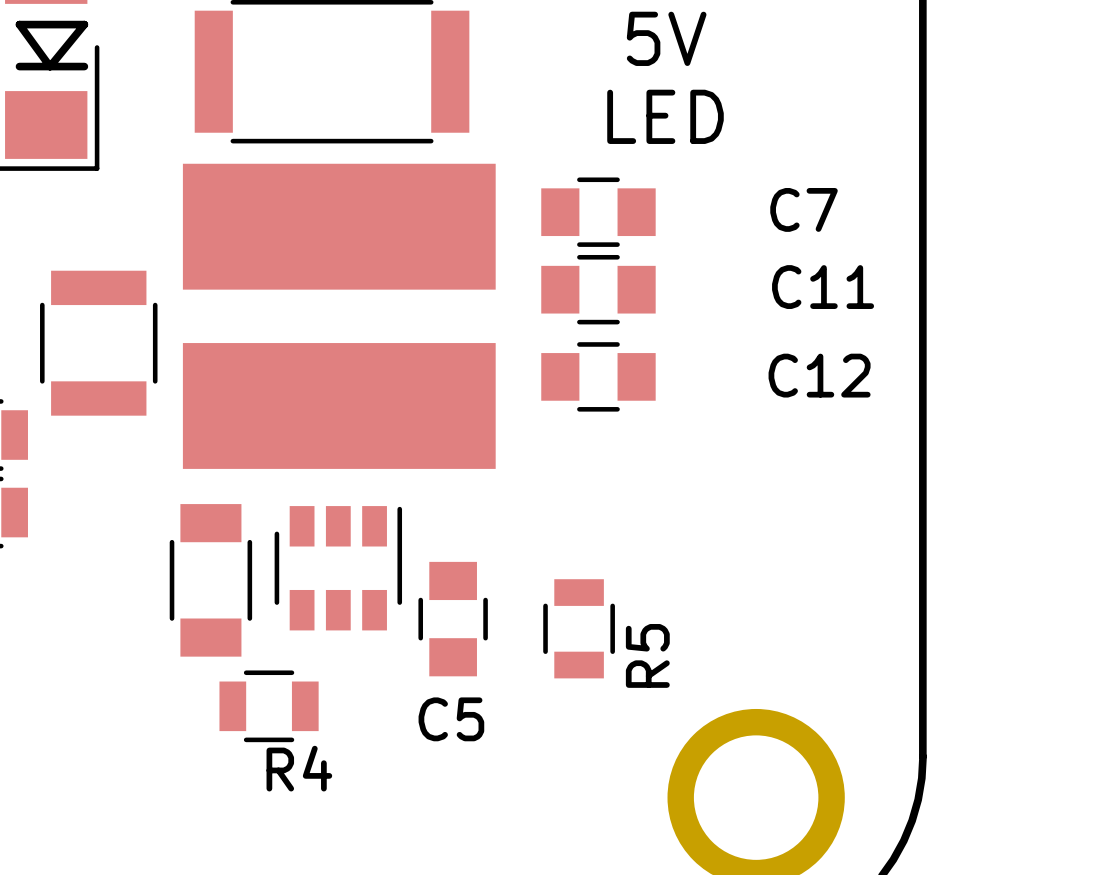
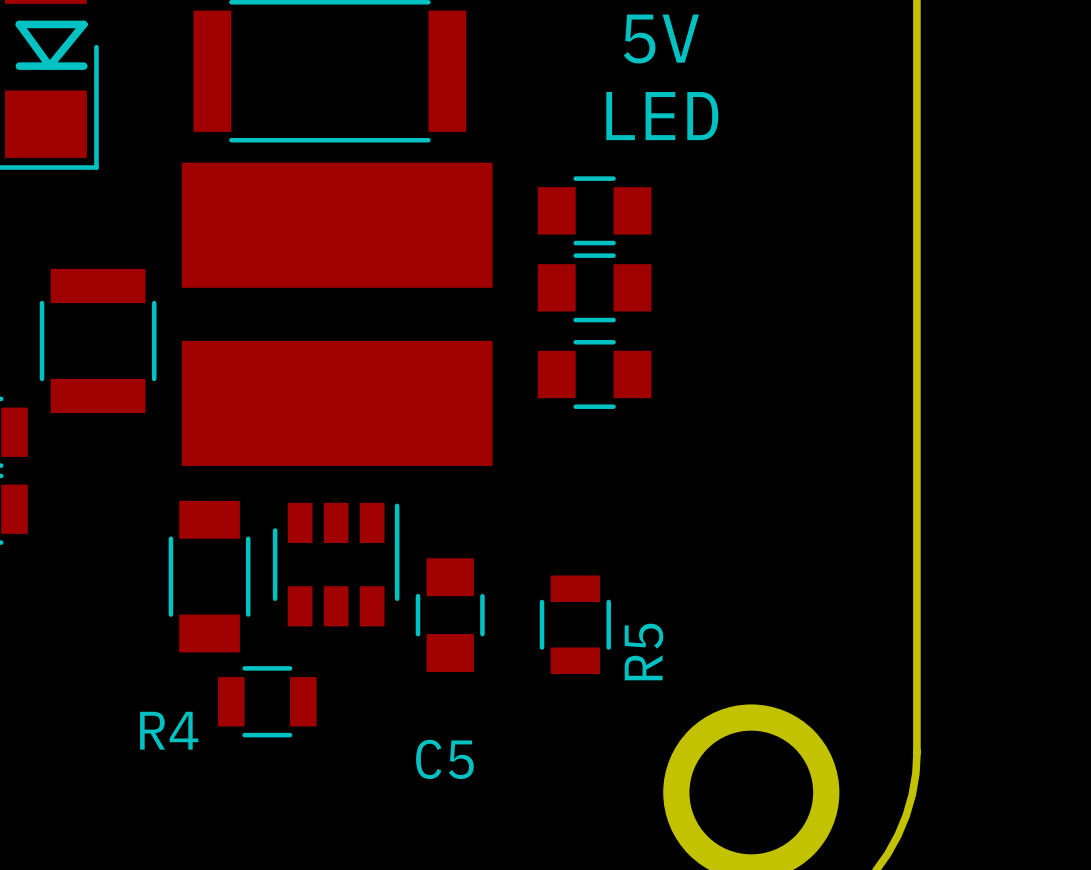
C7 name: C7 (804, 209) -> none
C11 name: C11 (823, 287) -> none
C12 name: C12 (819, 375) -> none
C5 name position: C5 (451, 719) -> C5 (444, 759)
R4 name position: R4 (299, 768) -> R4 (169, 730)

